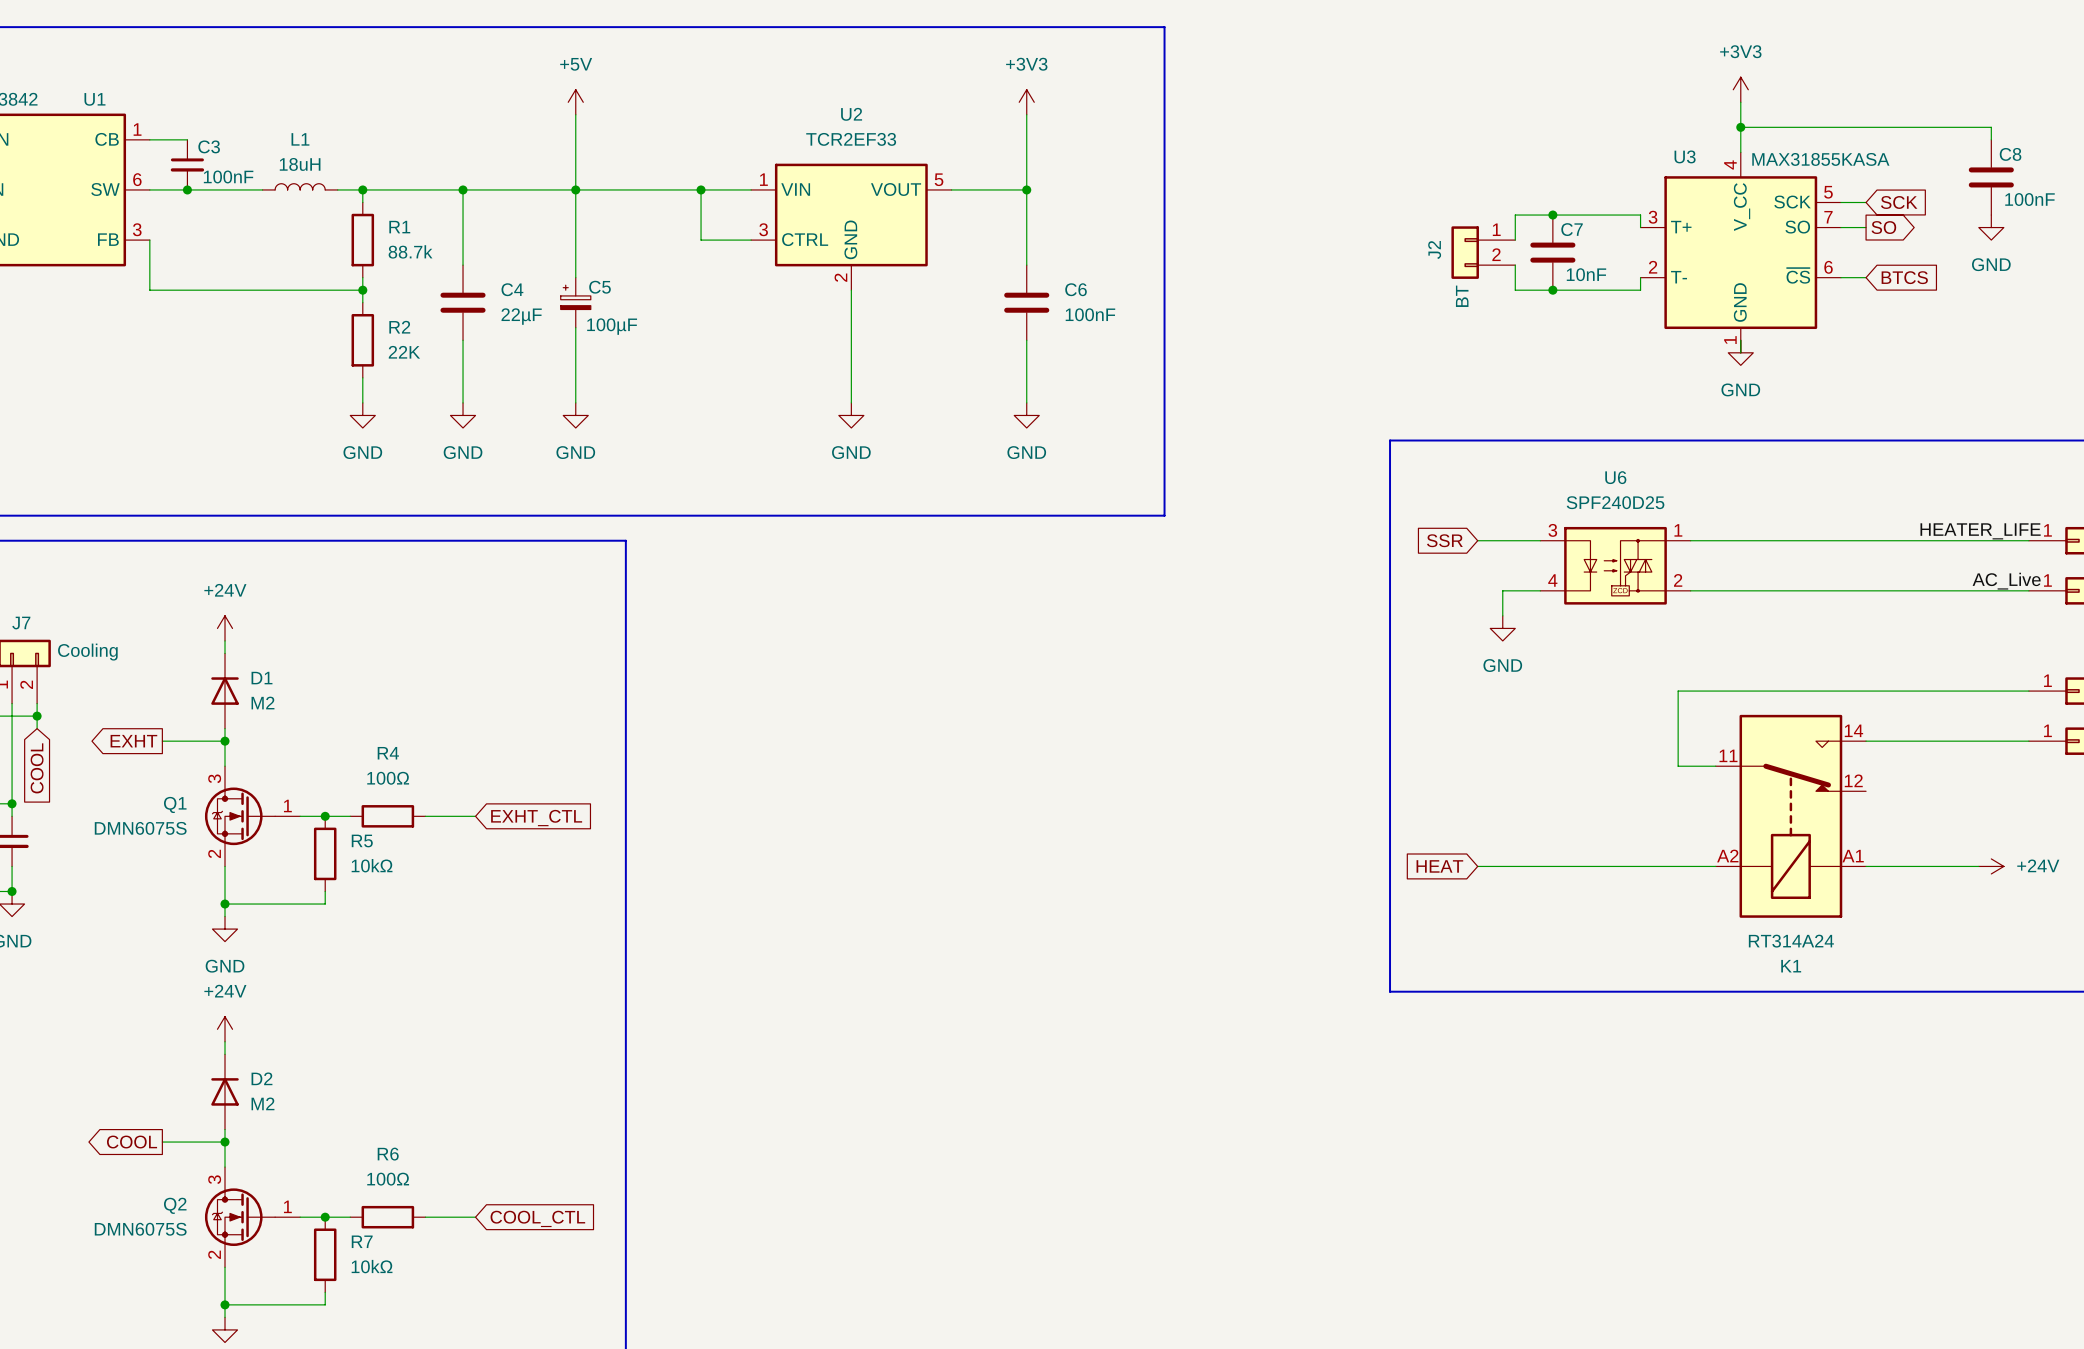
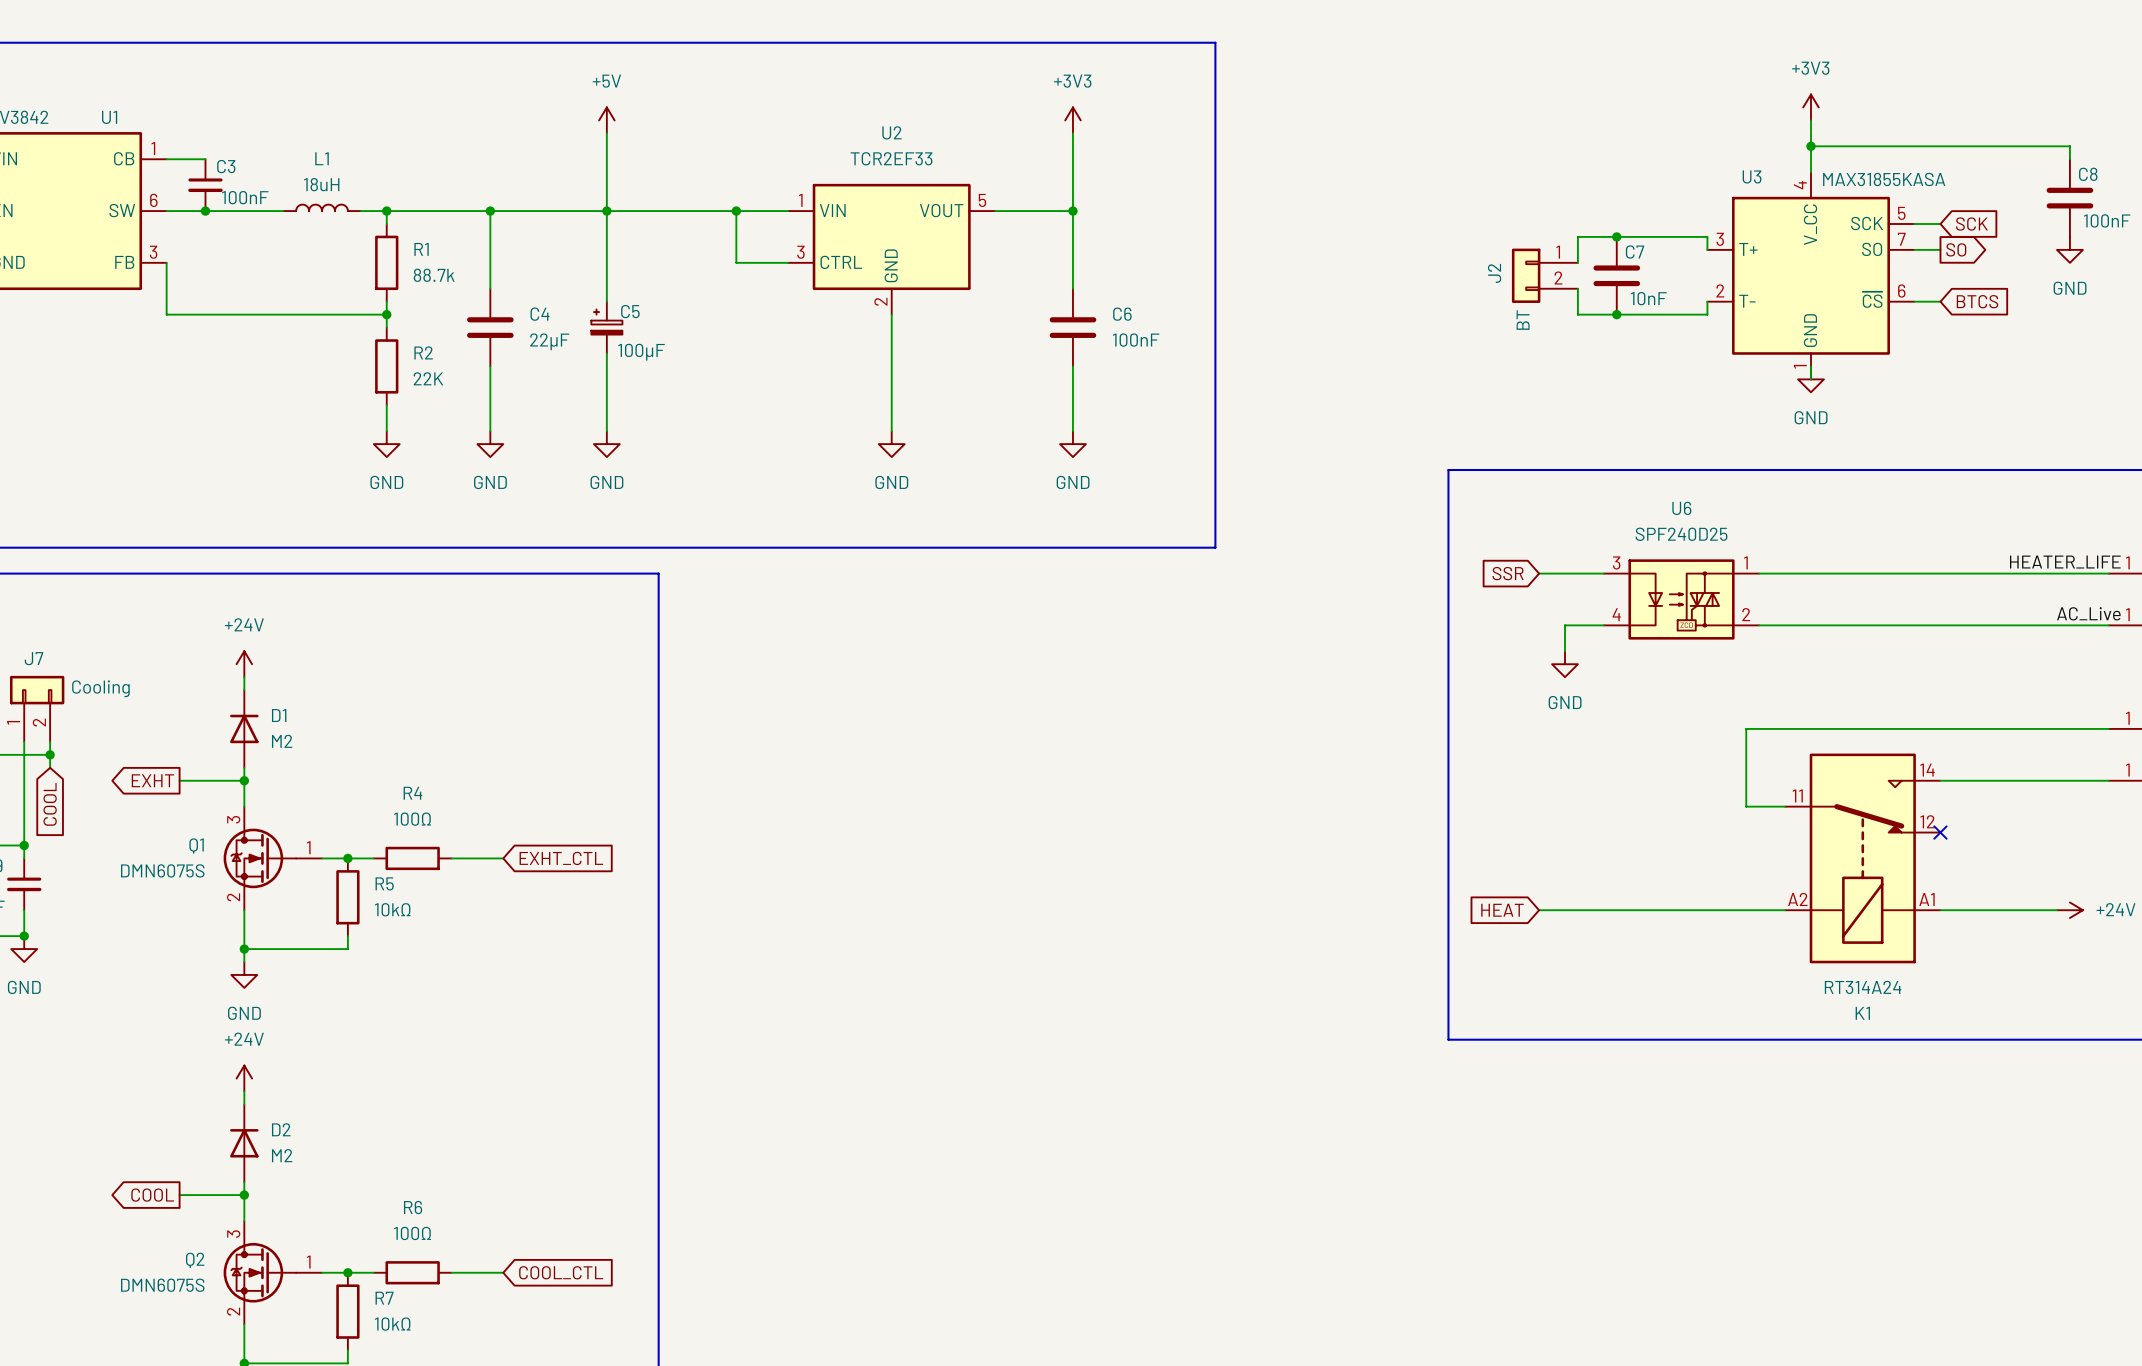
no-connect mark: none -> (1940, 832)

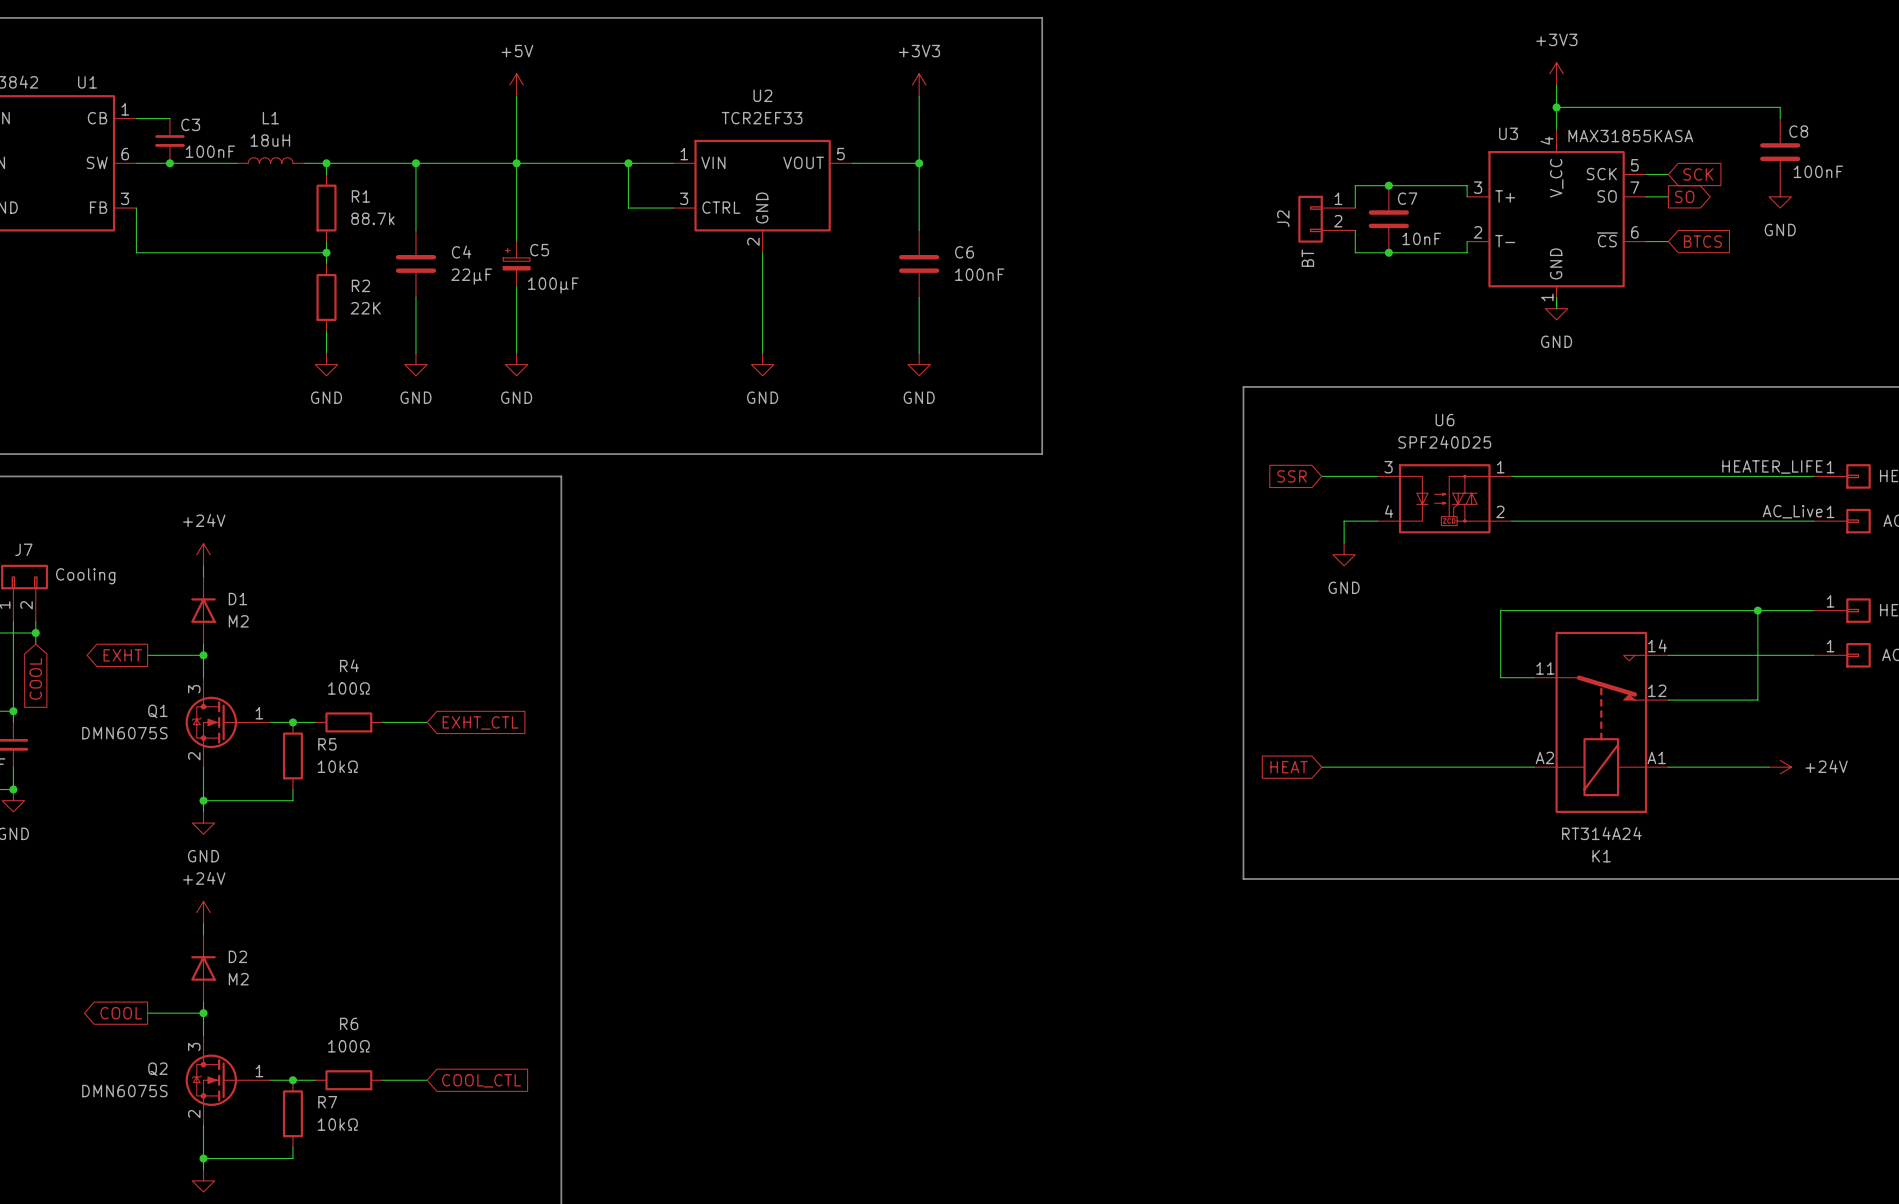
wire: none -> (1757, 610) (1757, 700) (1668, 700)
junction: none -> (1757, 610)
no-connect mark: (1940, 832) -> none

